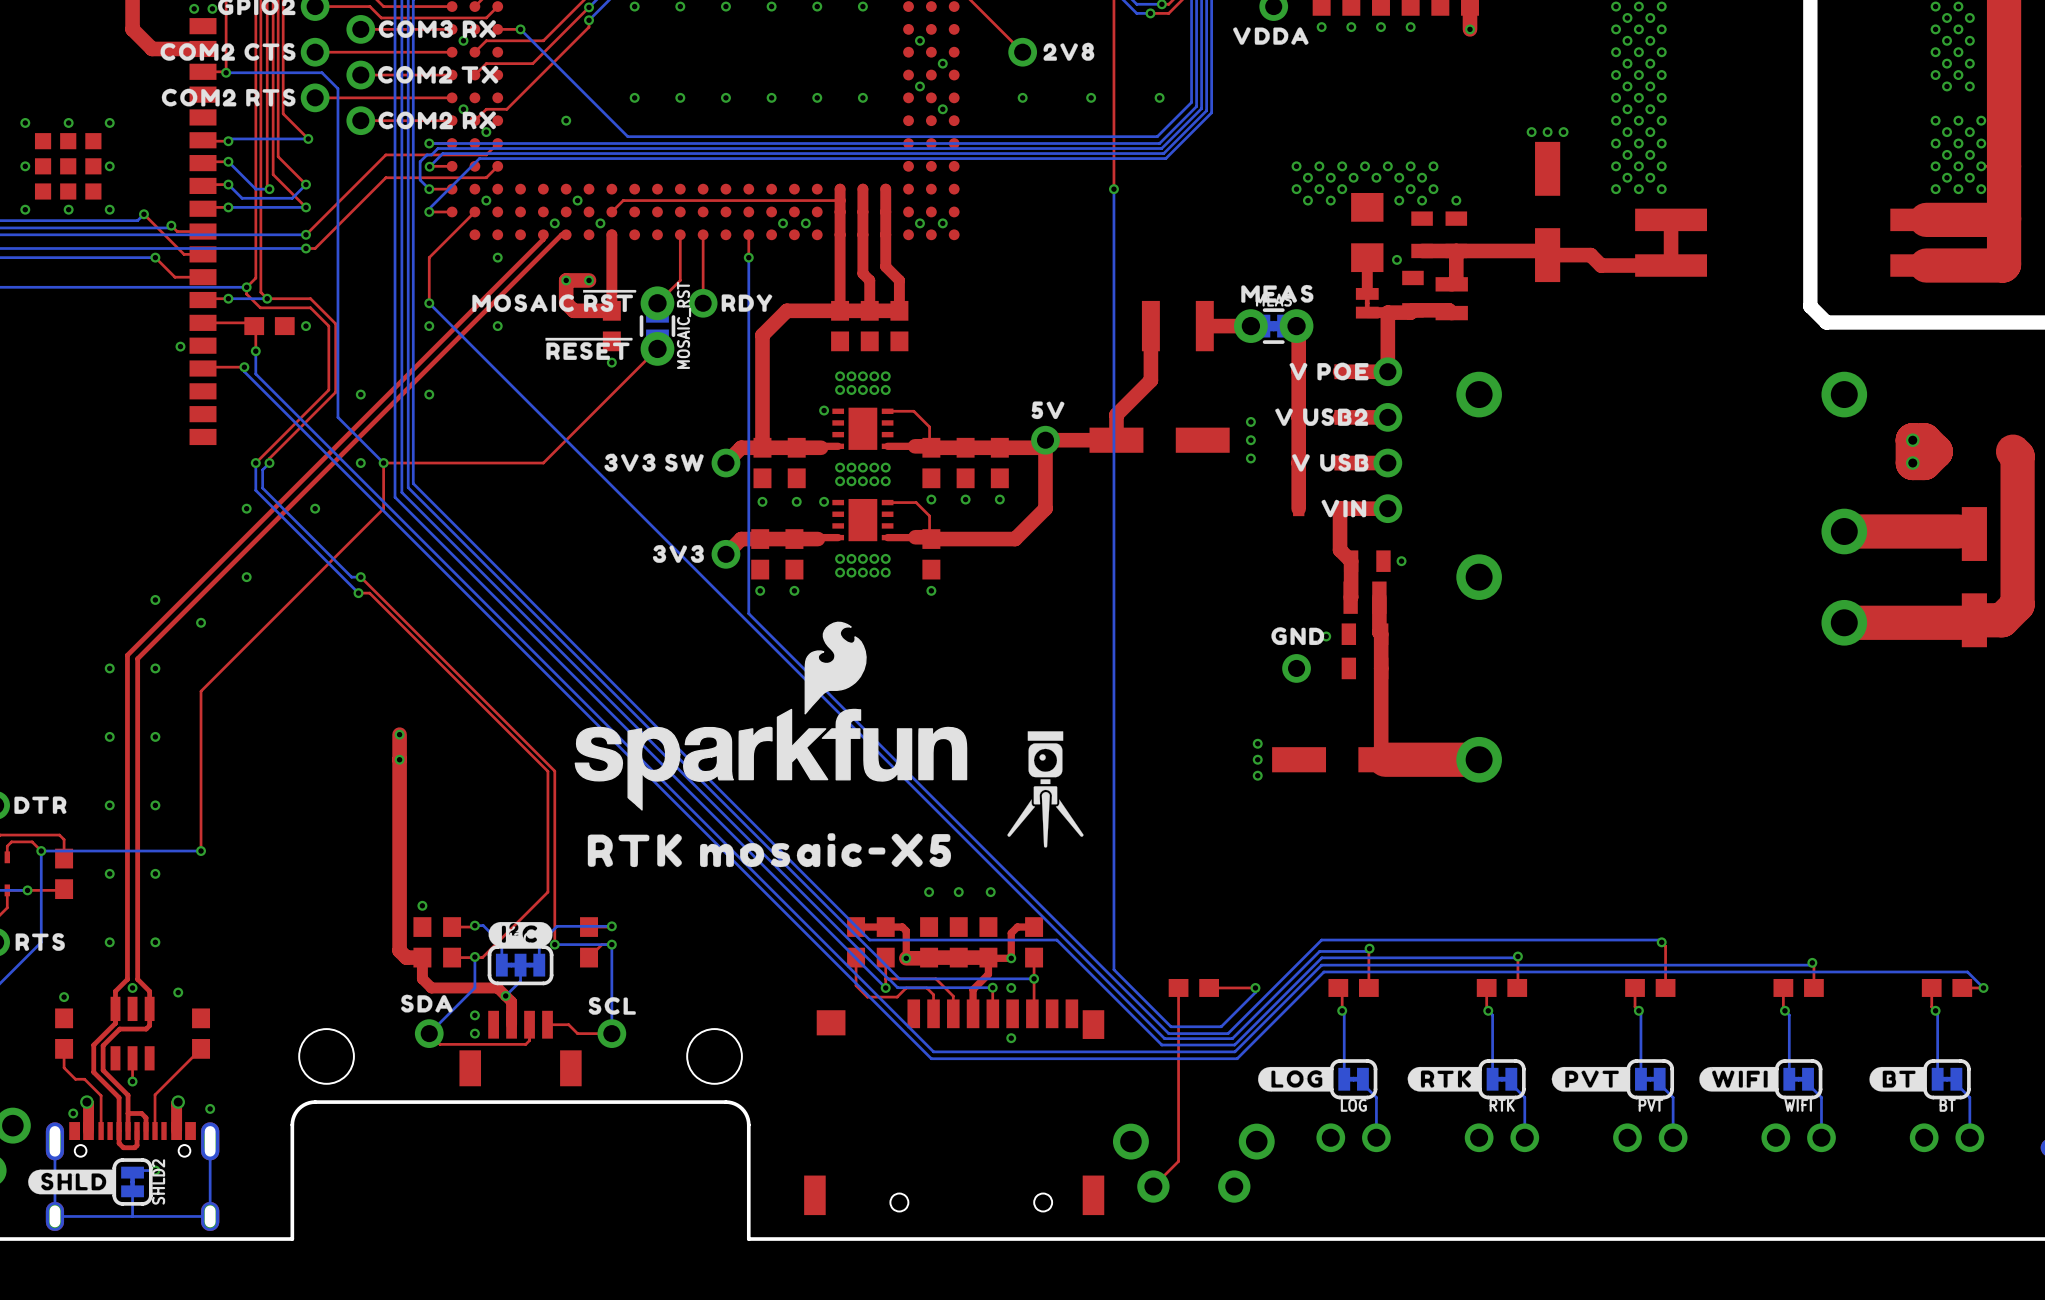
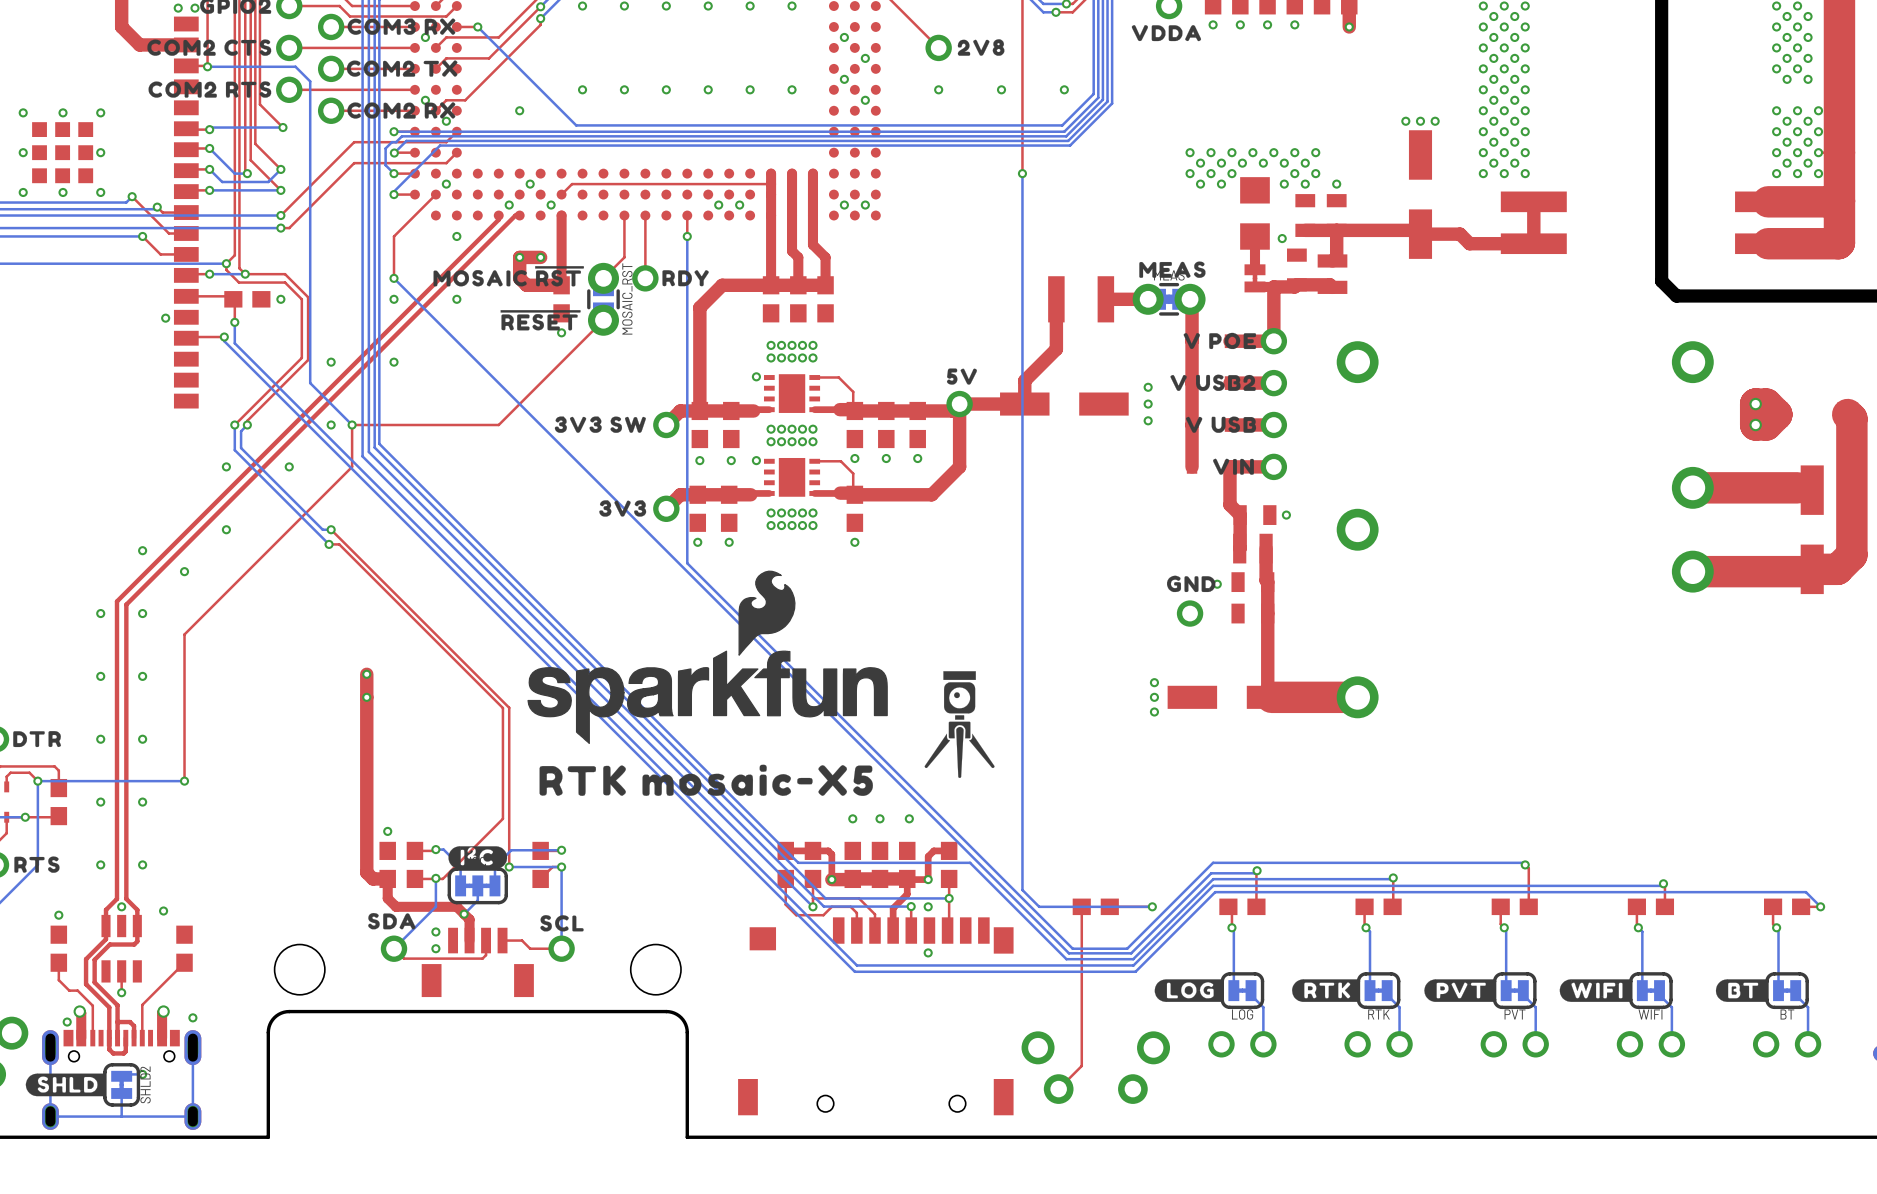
bottom track: (1255, 987) (1255, 992) (1221, 1026) (1171, 1026) (1132, 987) -> (1152, 906) (1039, 906)

